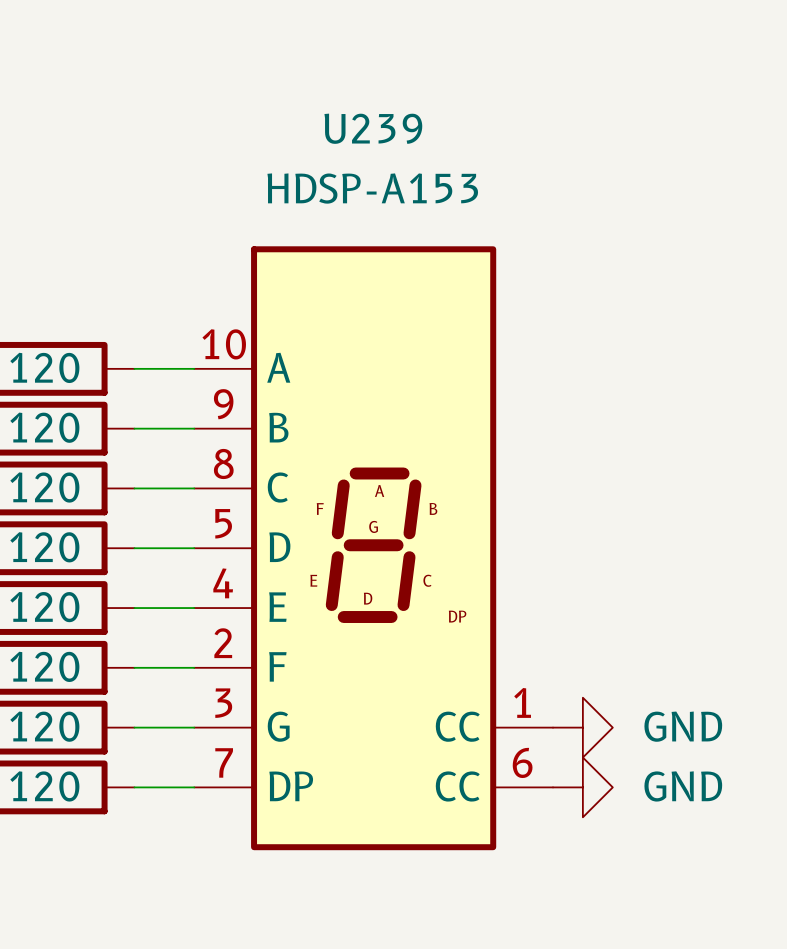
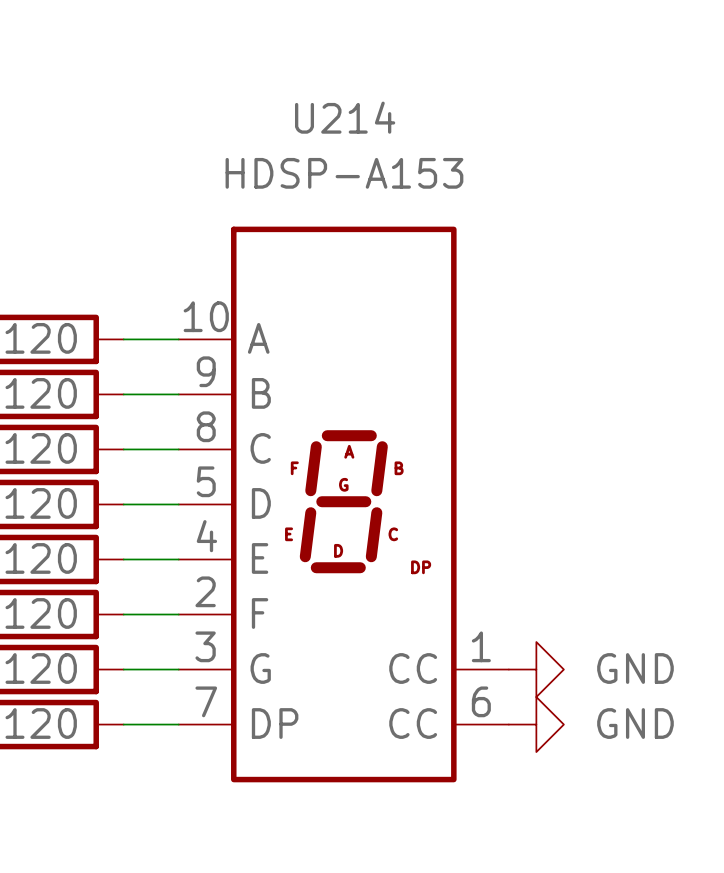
U239 name: U239 (373, 128) -> U214 (345, 117)

